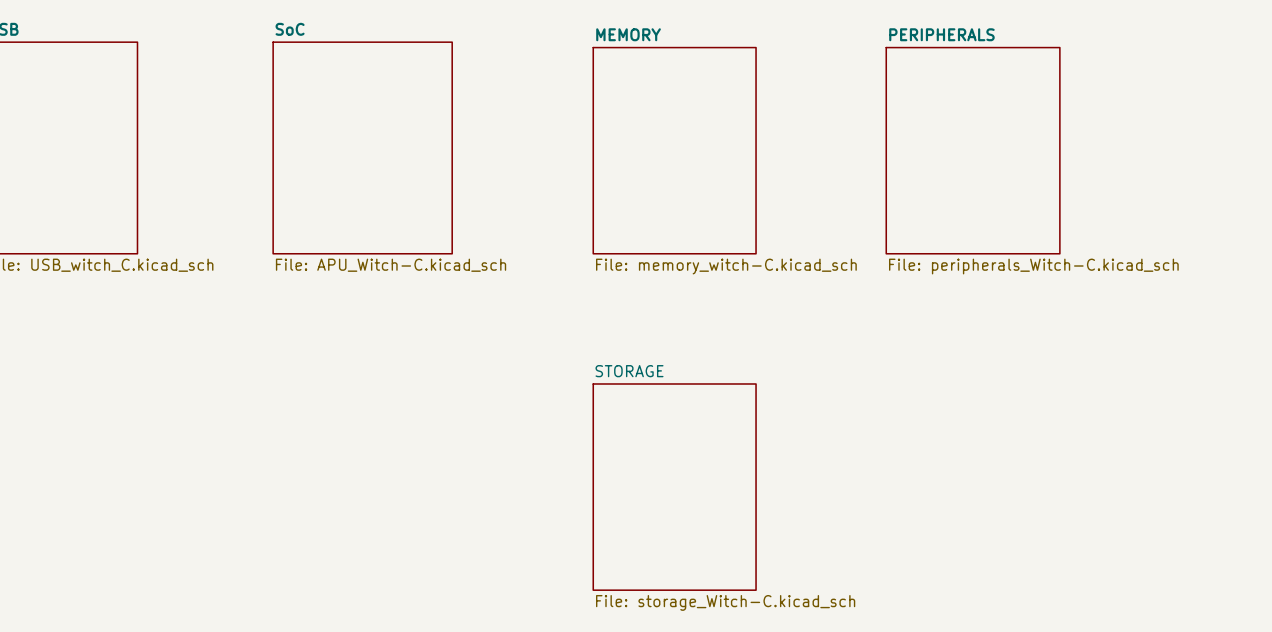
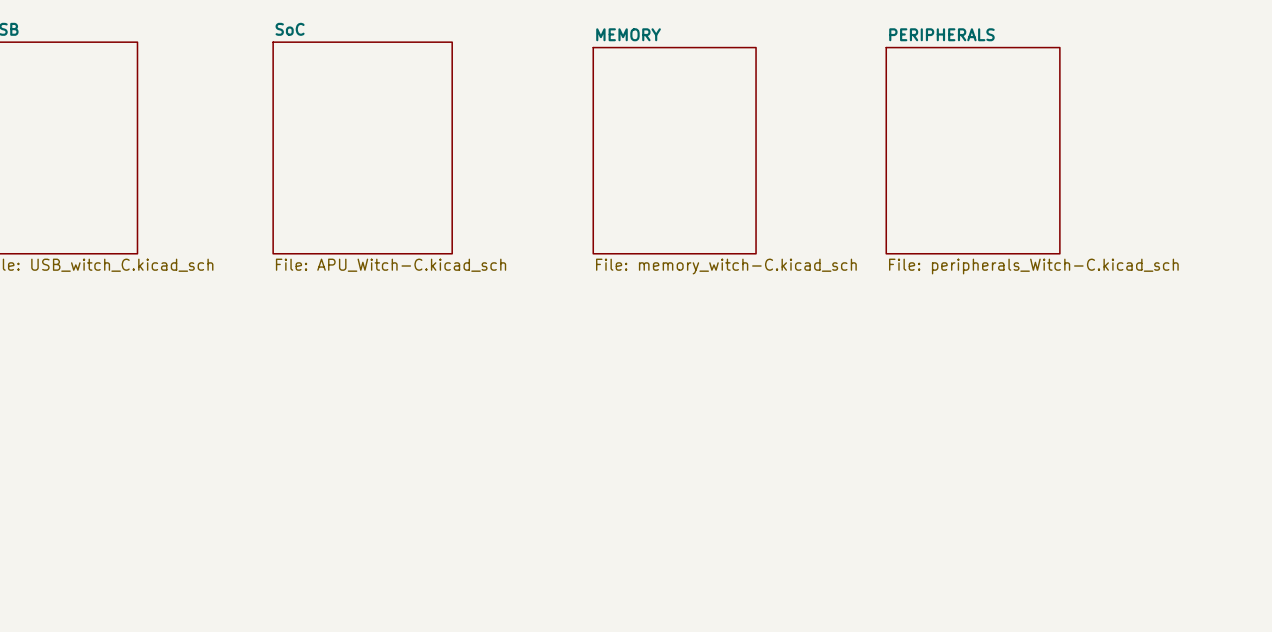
sheet STORAGE: File: storage_Witch-C.kicad_sch (674, 487) -> none

